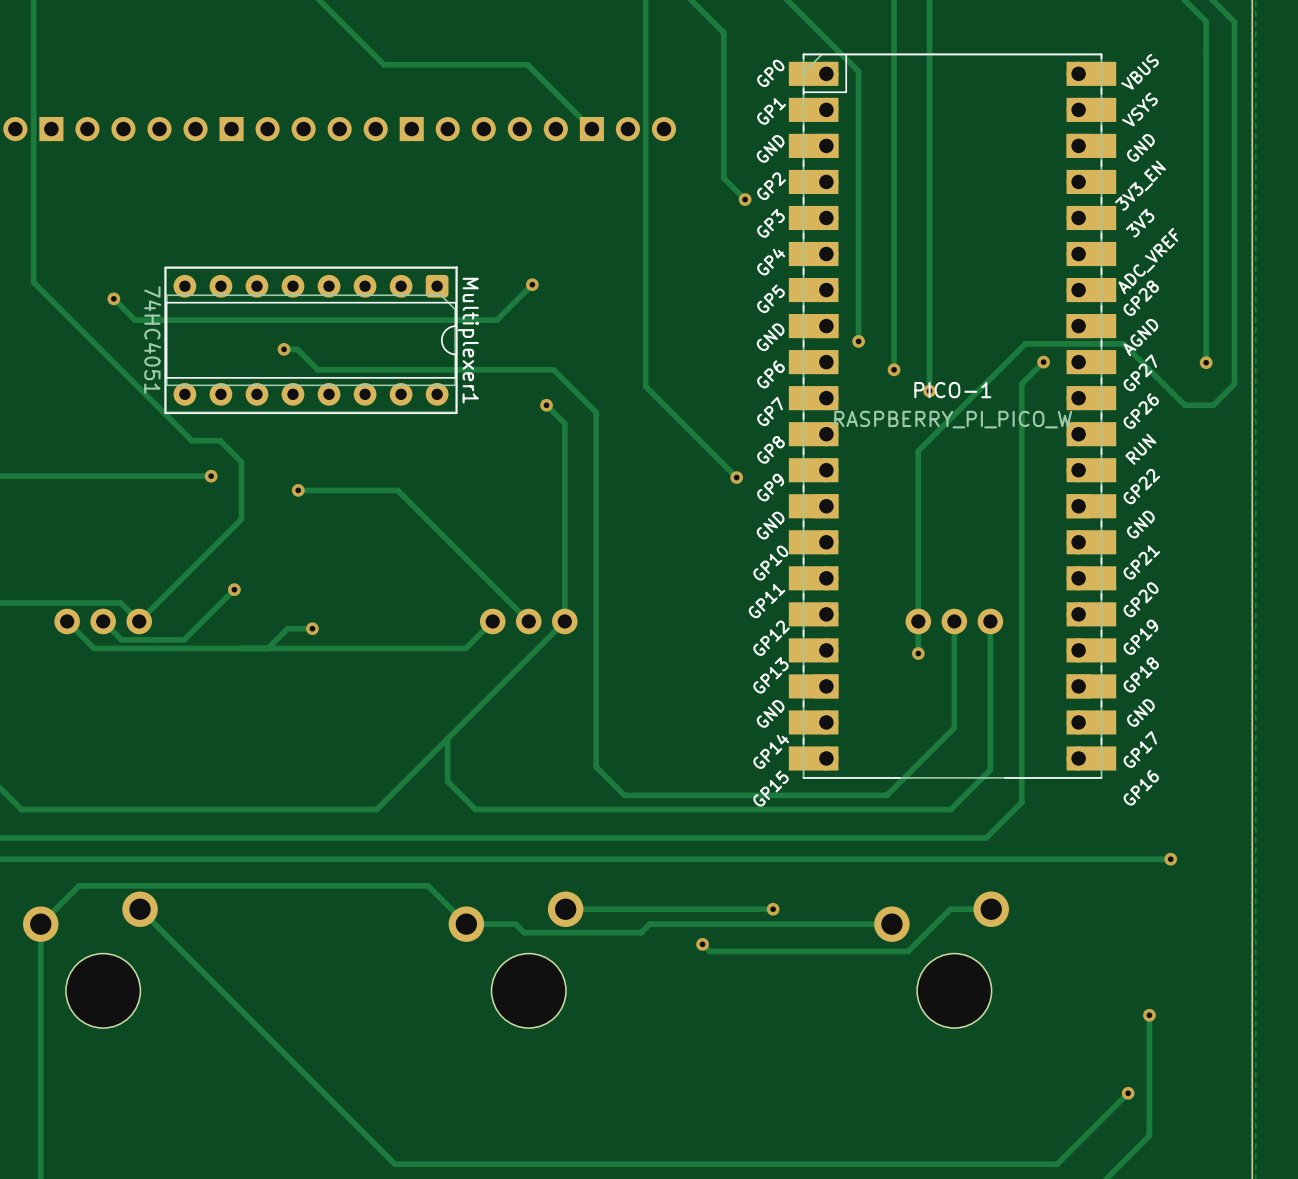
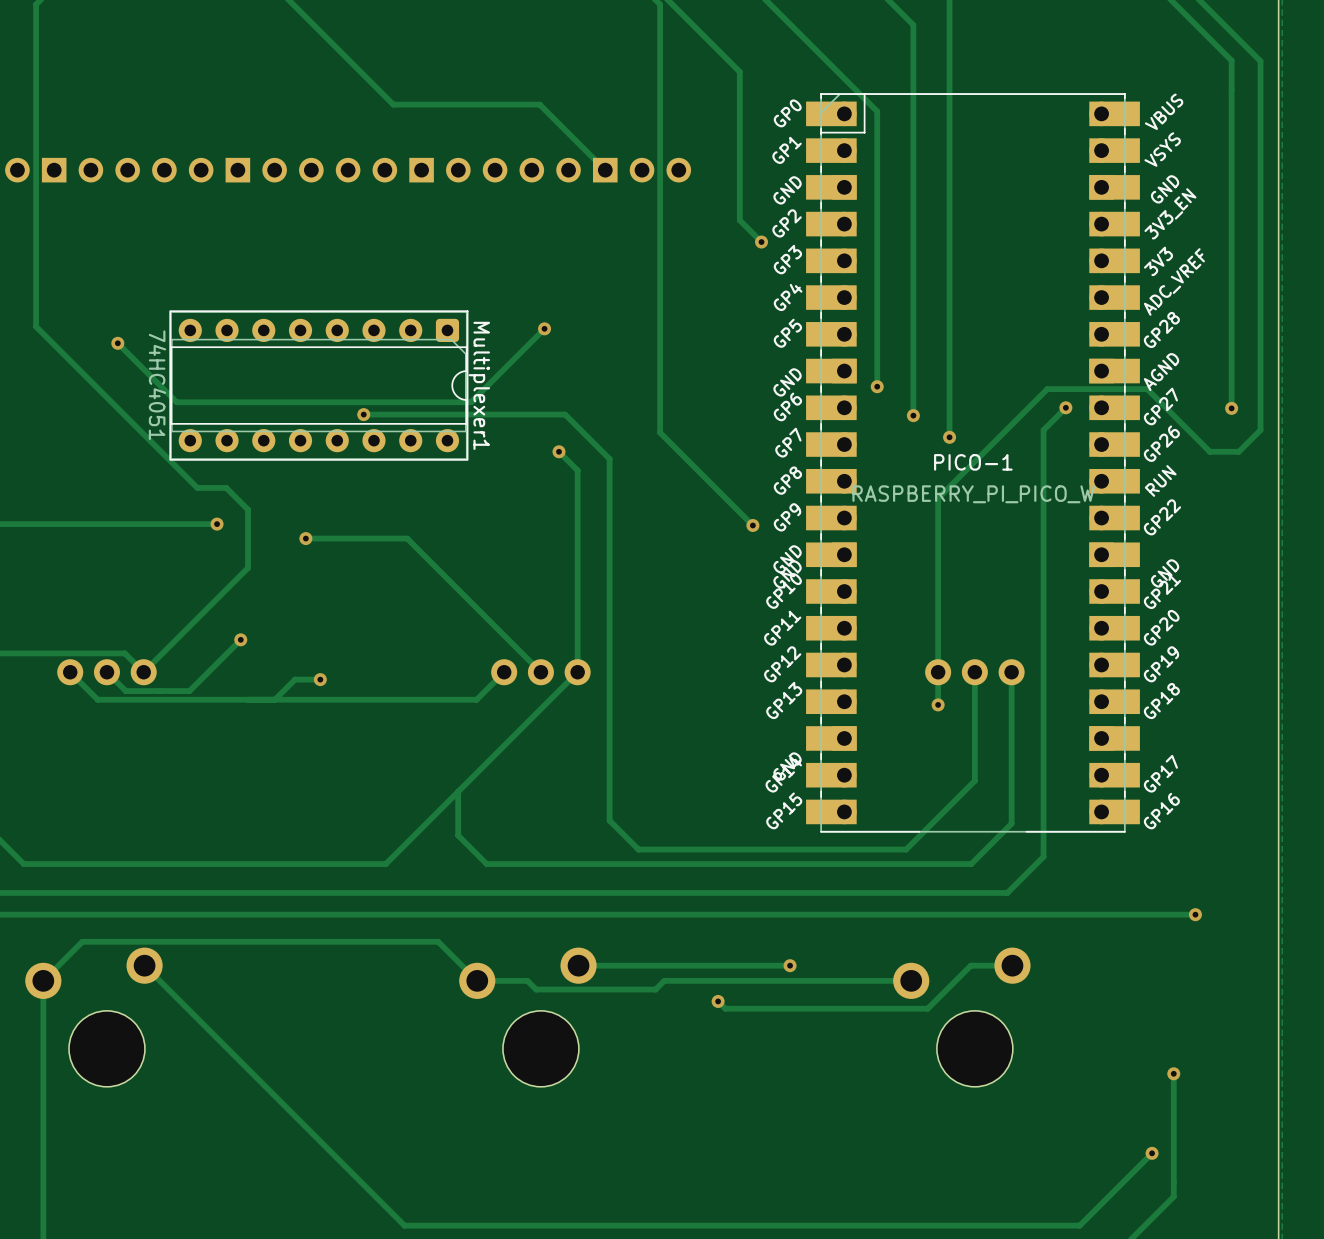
PICO-1 footprint: [788, 53, 1117, 779] -> [806, 93, 1140, 833]
track: (496, 320) (135, 320) -> (508, 364) (471, 402) (176, 402) (139, 364)
track: (284, 349) (297, 349) (317, 369) (553, 369) -> (363, 414) (566, 415)
via position: (284, 349) -> (363, 414)

